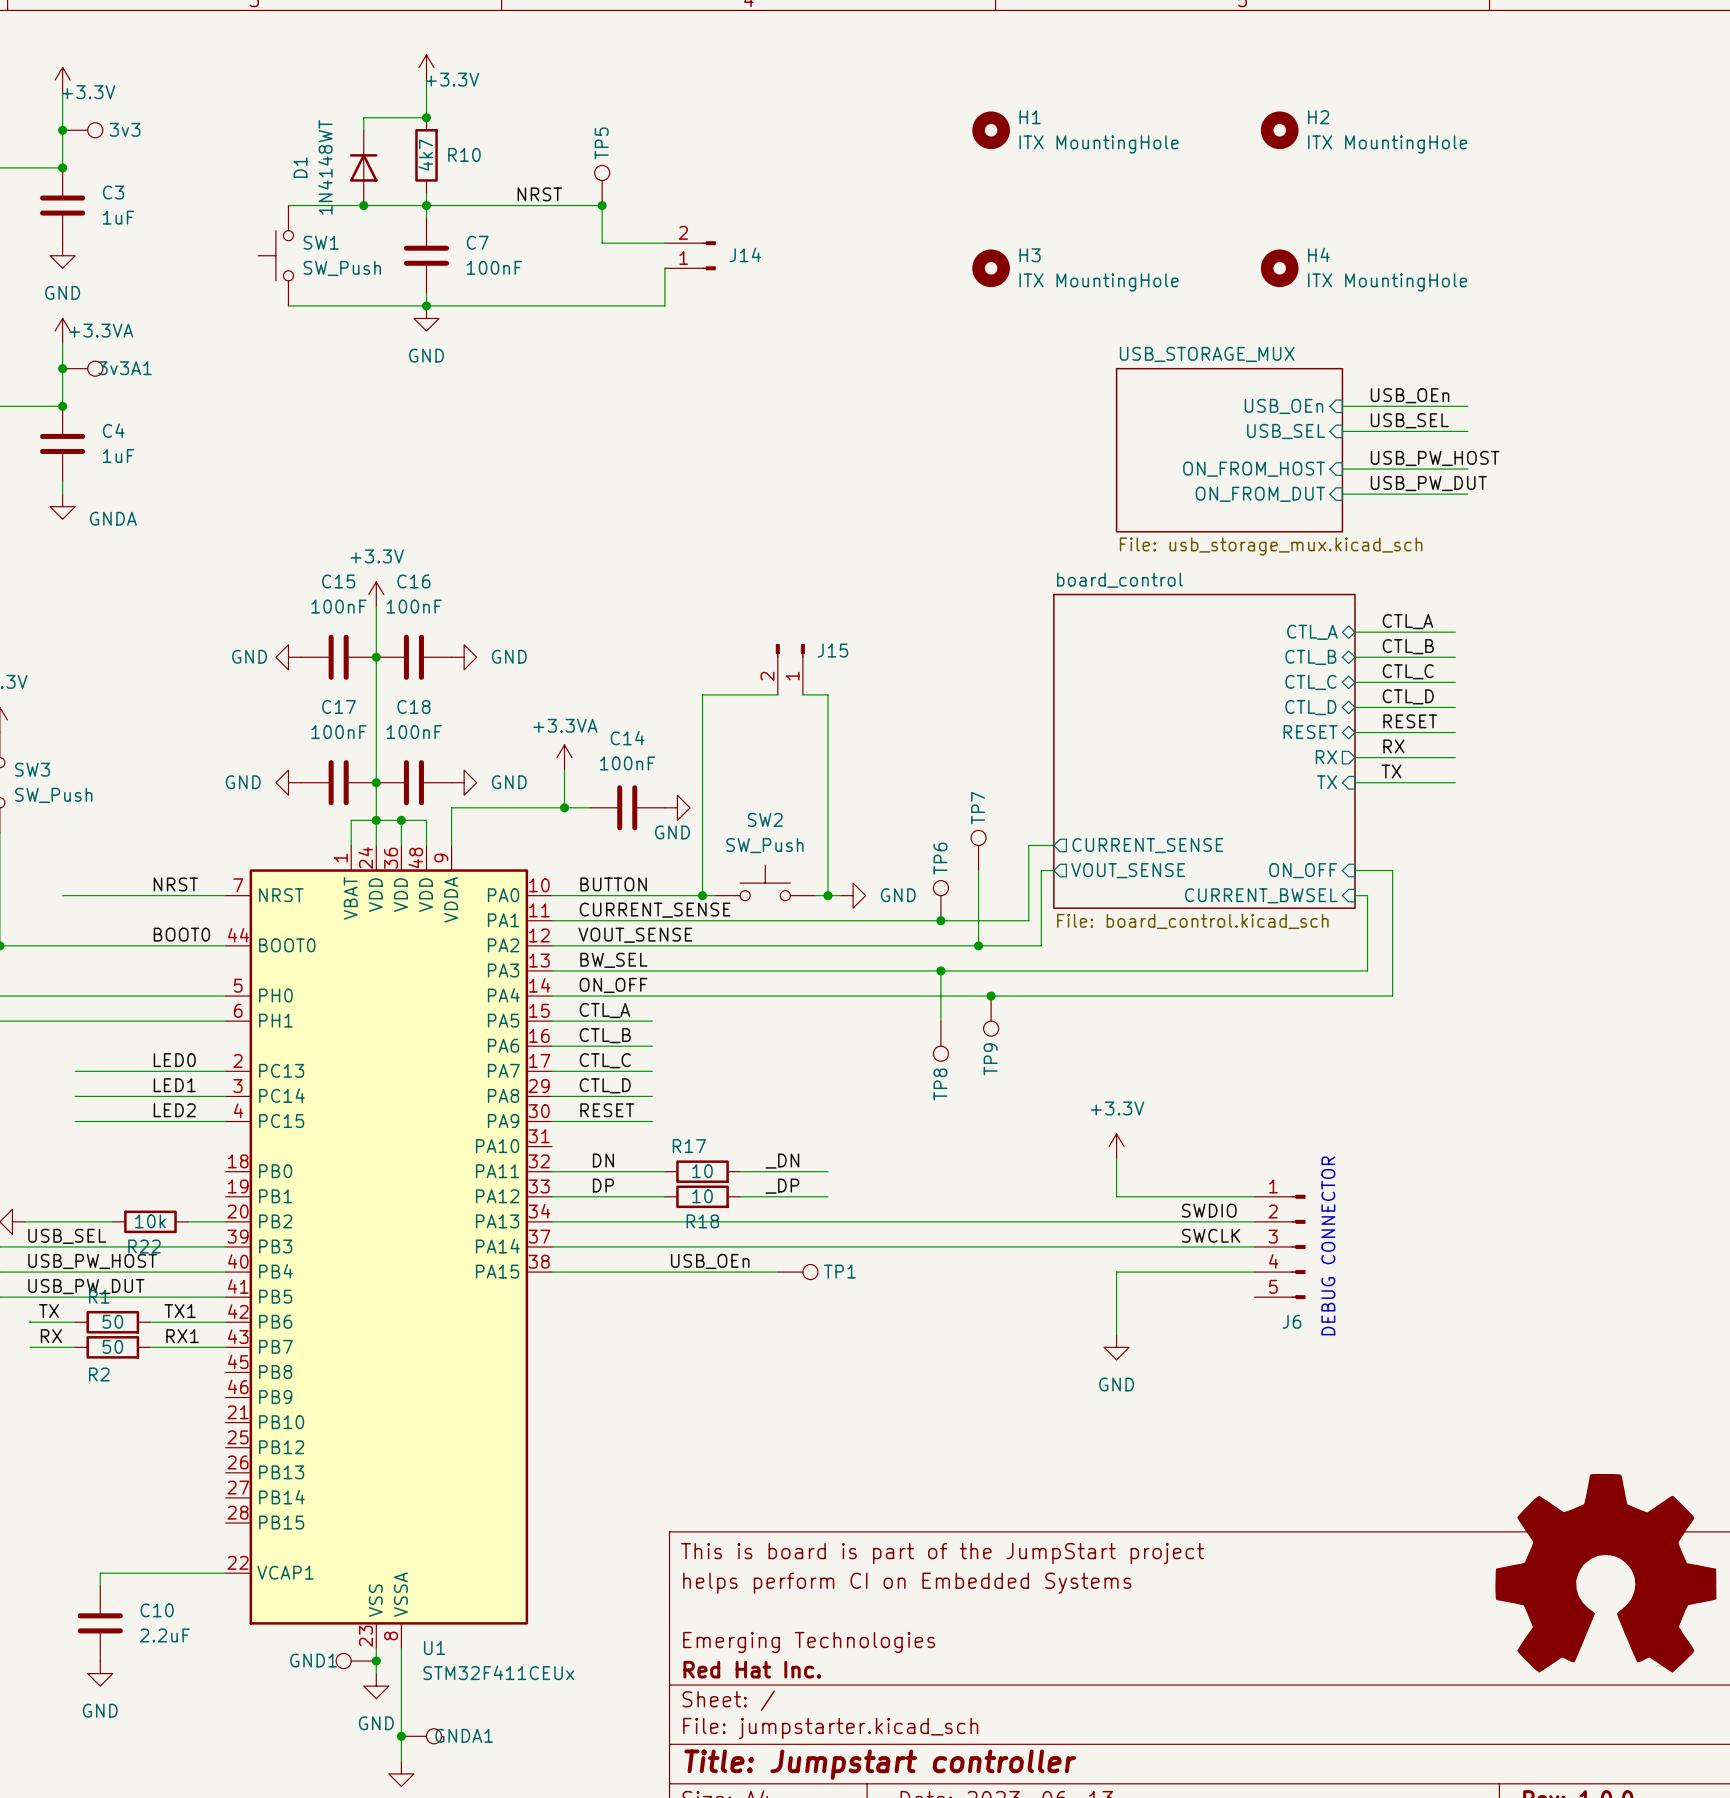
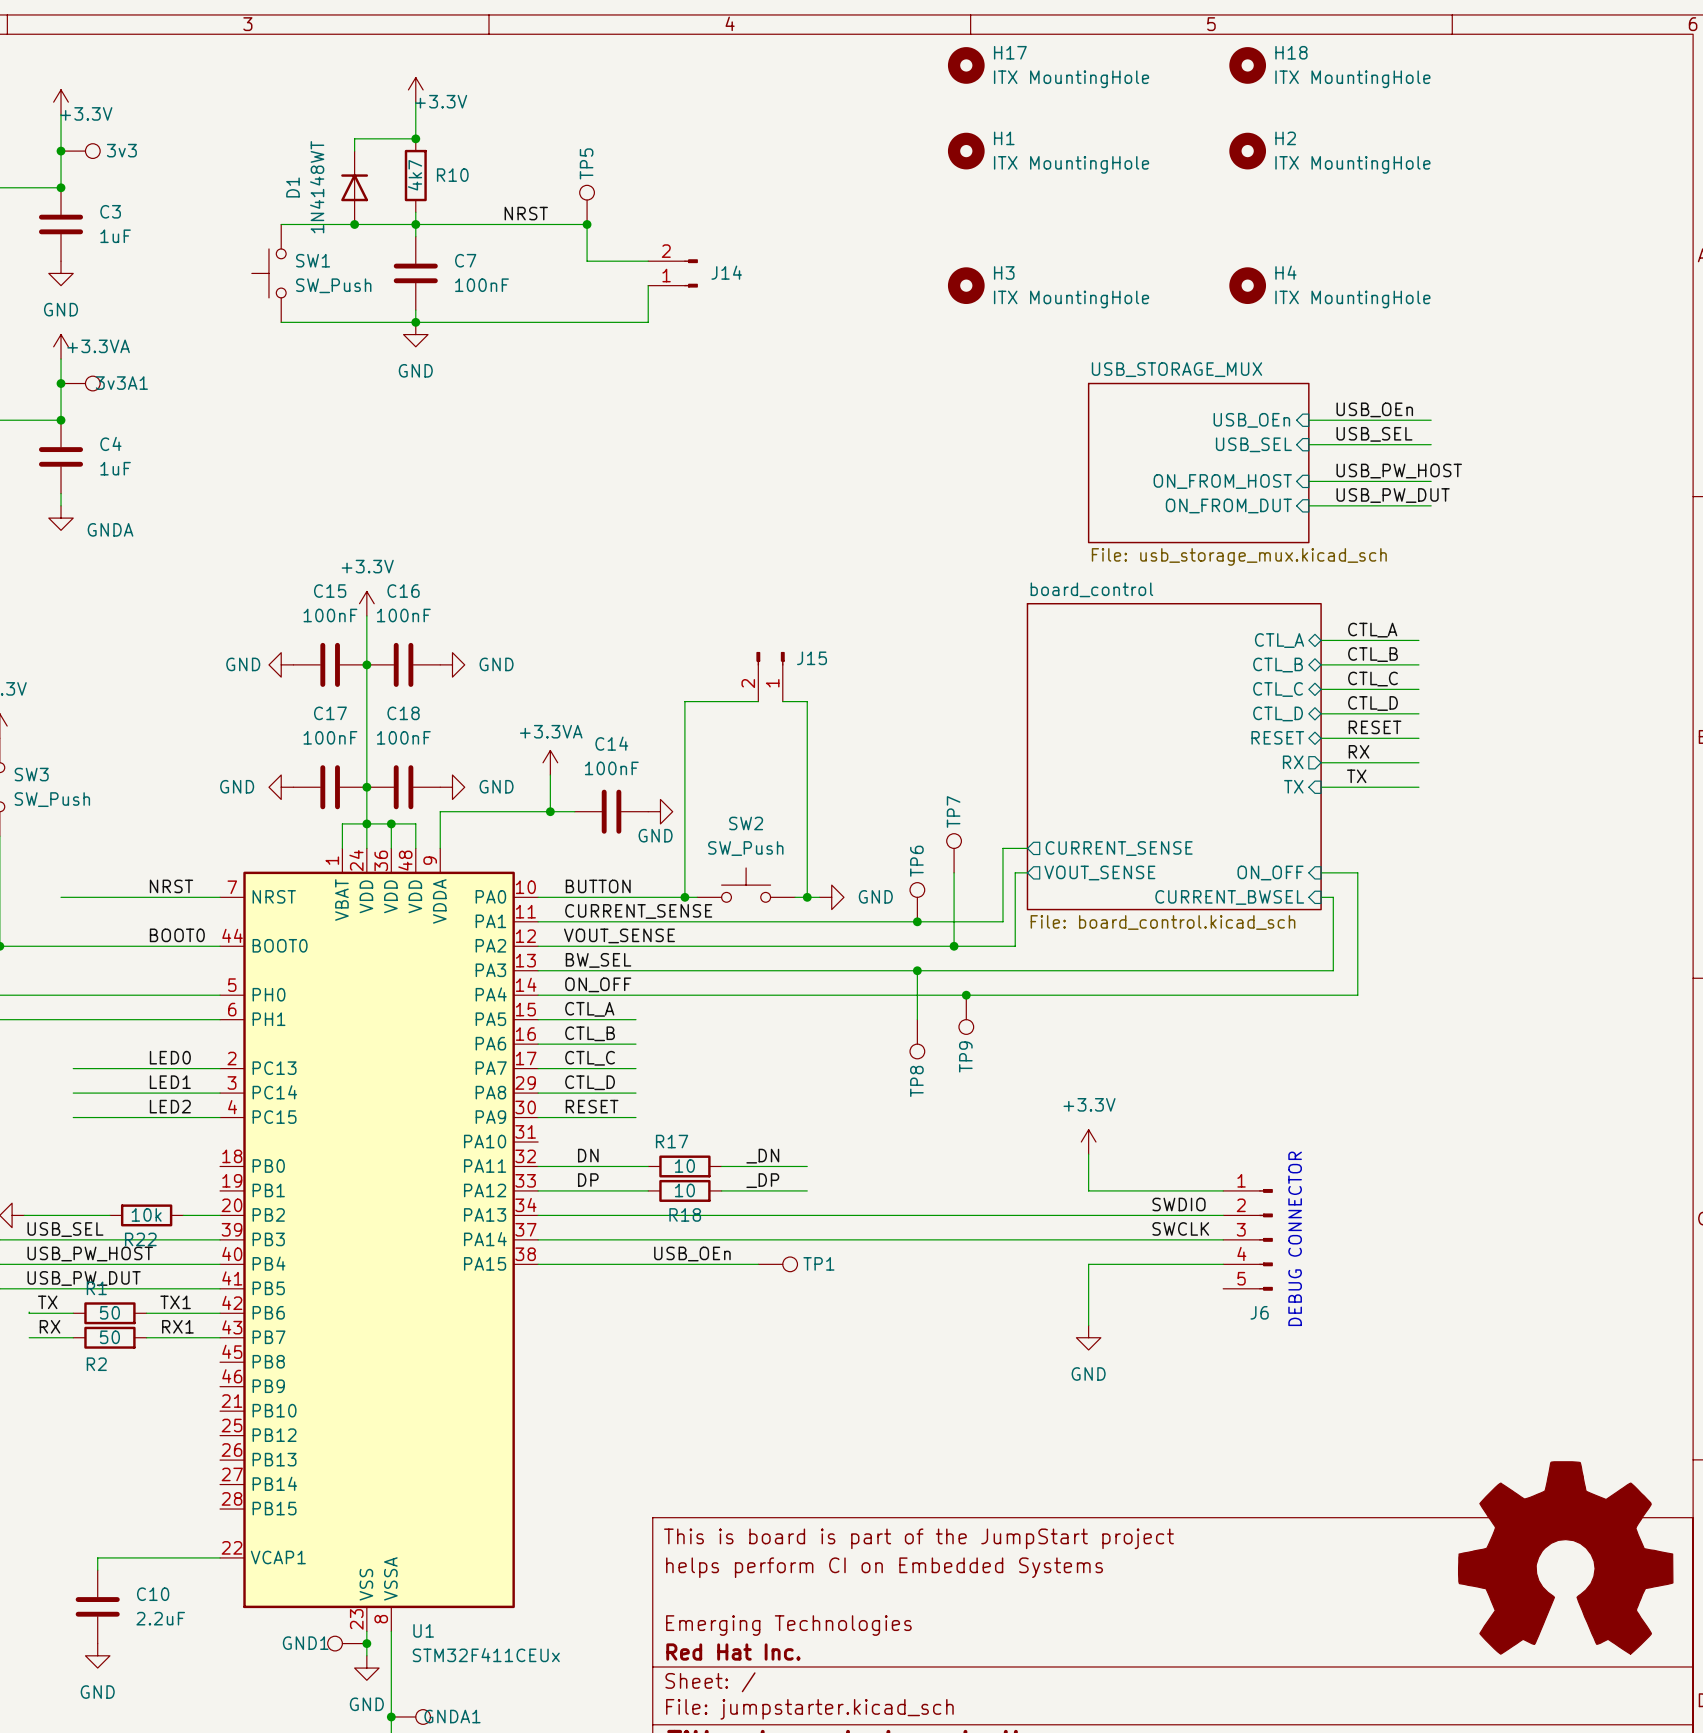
H17: none -> ITX MountingHole (966, 65)
H18: none -> ITX MountingHole (1247, 65)

